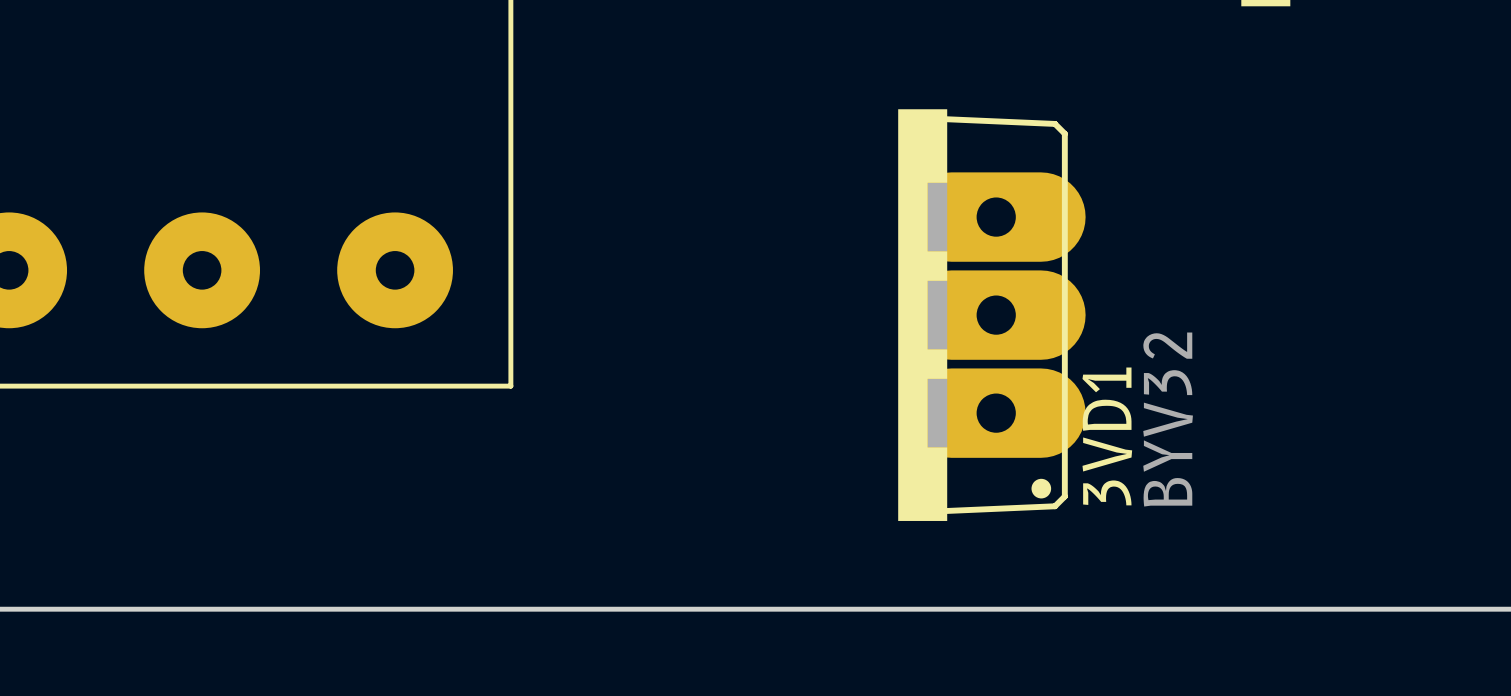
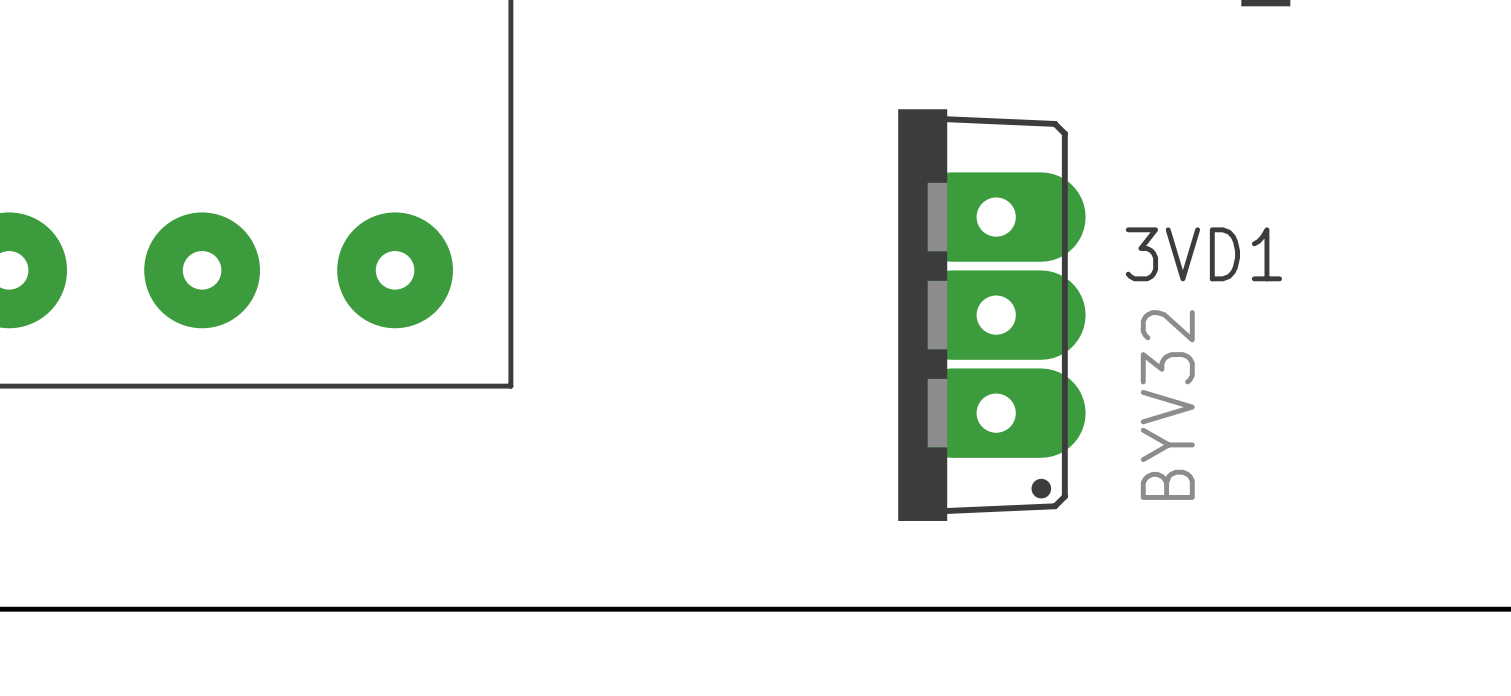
3VD1 name rotation: 0° (1107, 436) -> 90° clockwise (1203, 254)

